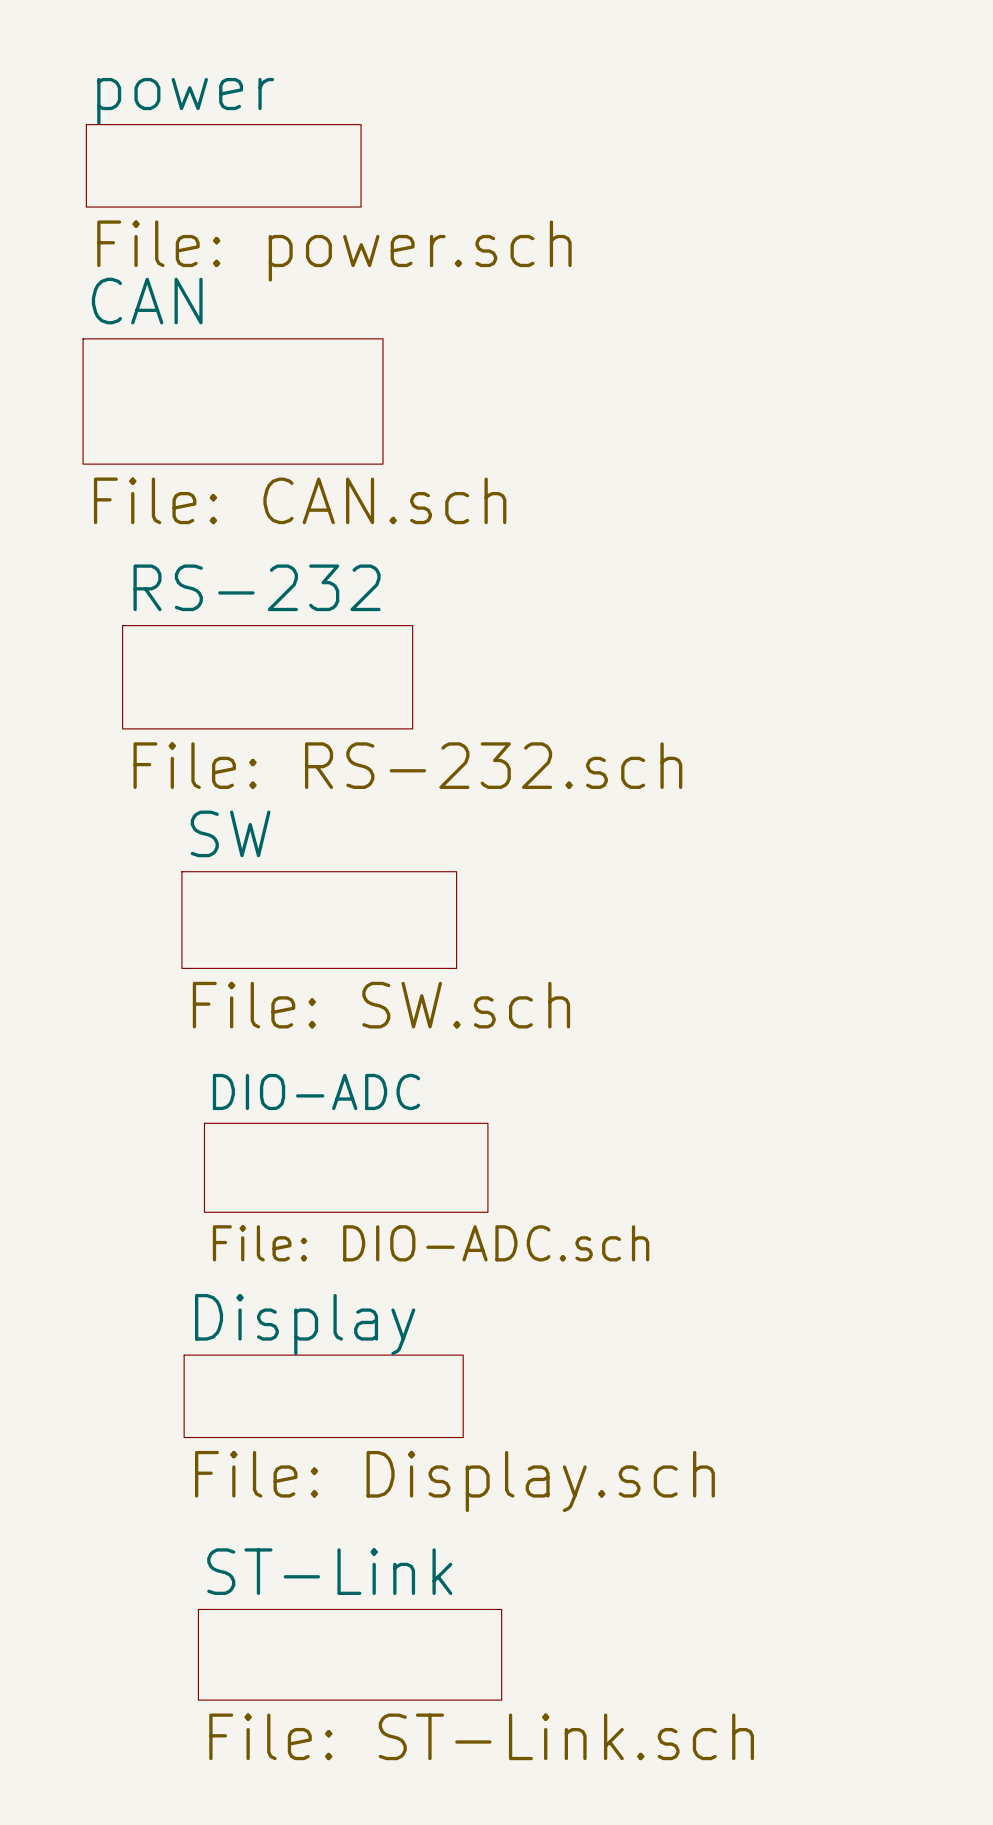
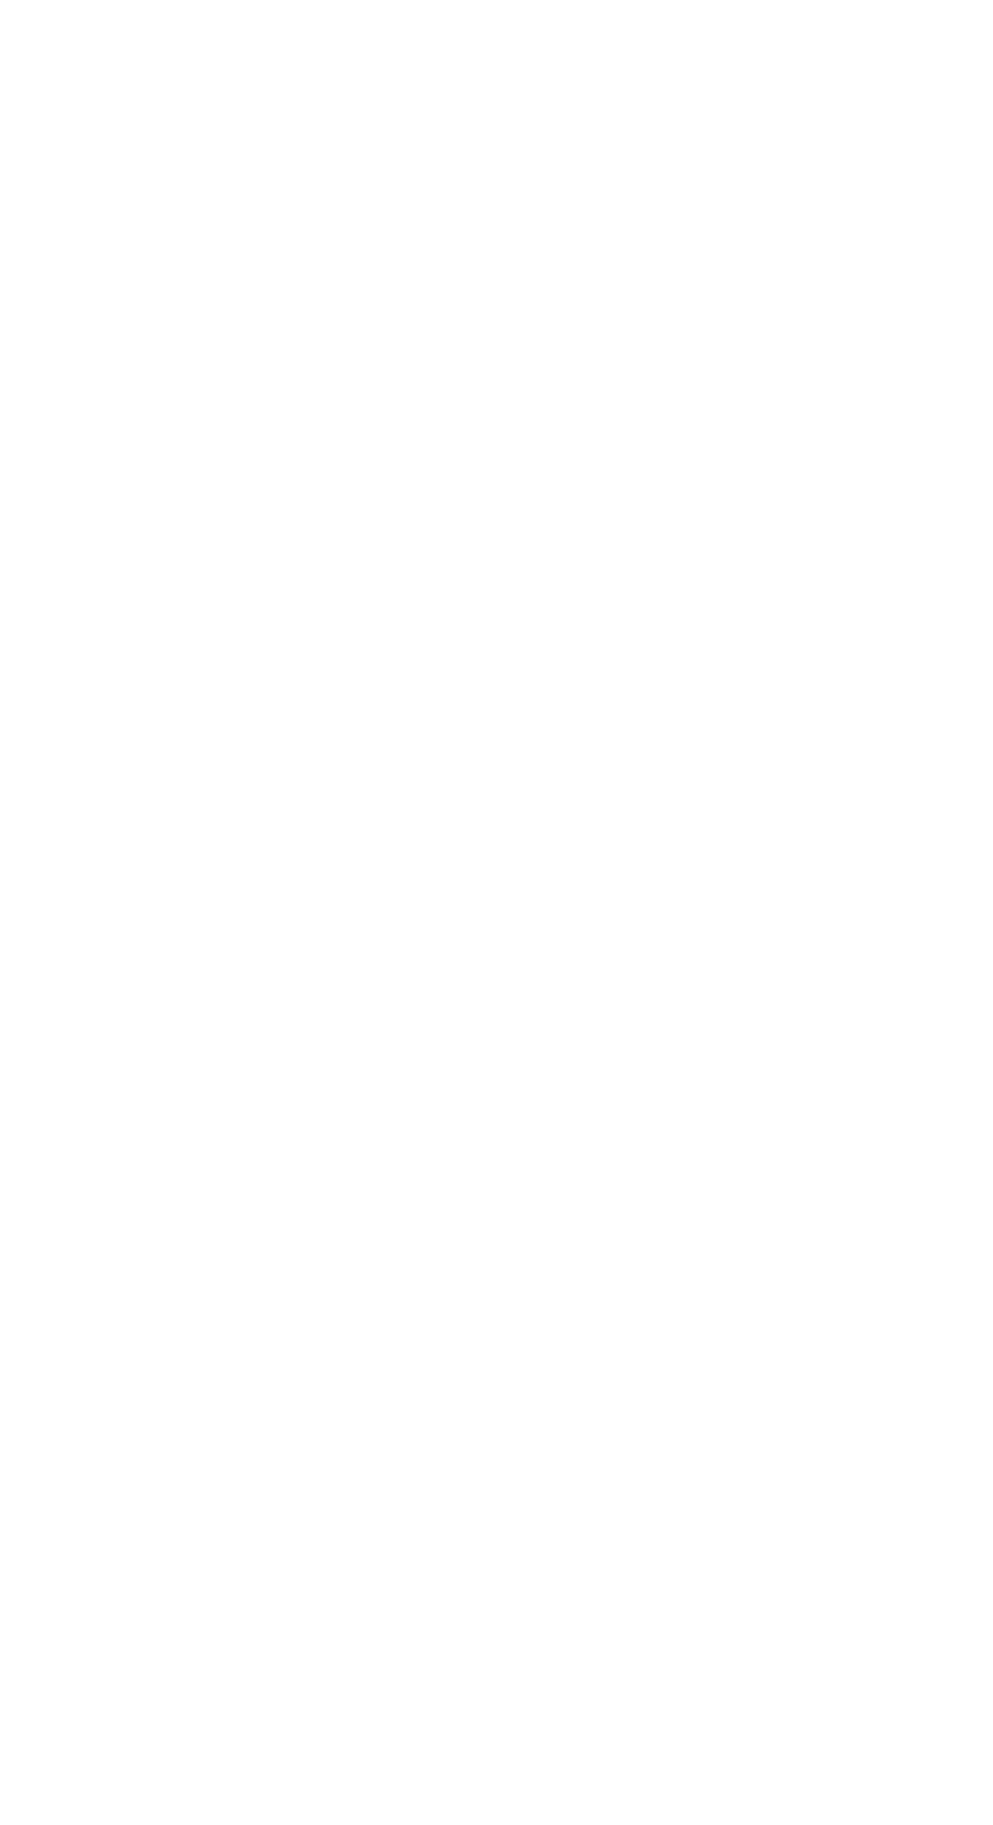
sheet power: File: power.sch (223, 165) -> none
sheet CAN: File: CAN.sch (233, 401) -> none
sheet RS-232: File: RS-232.sch (267, 677) -> none
sheet SW: File: SW.sch (319, 920) -> none
sheet DIO-ADC: File: DIO-ADC.sch (346, 1167) -> none
sheet Display: File: Display.sch (323, 1396) -> none
sheet ST-Link: File: ST-Link.sch (350, 1654) -> none

